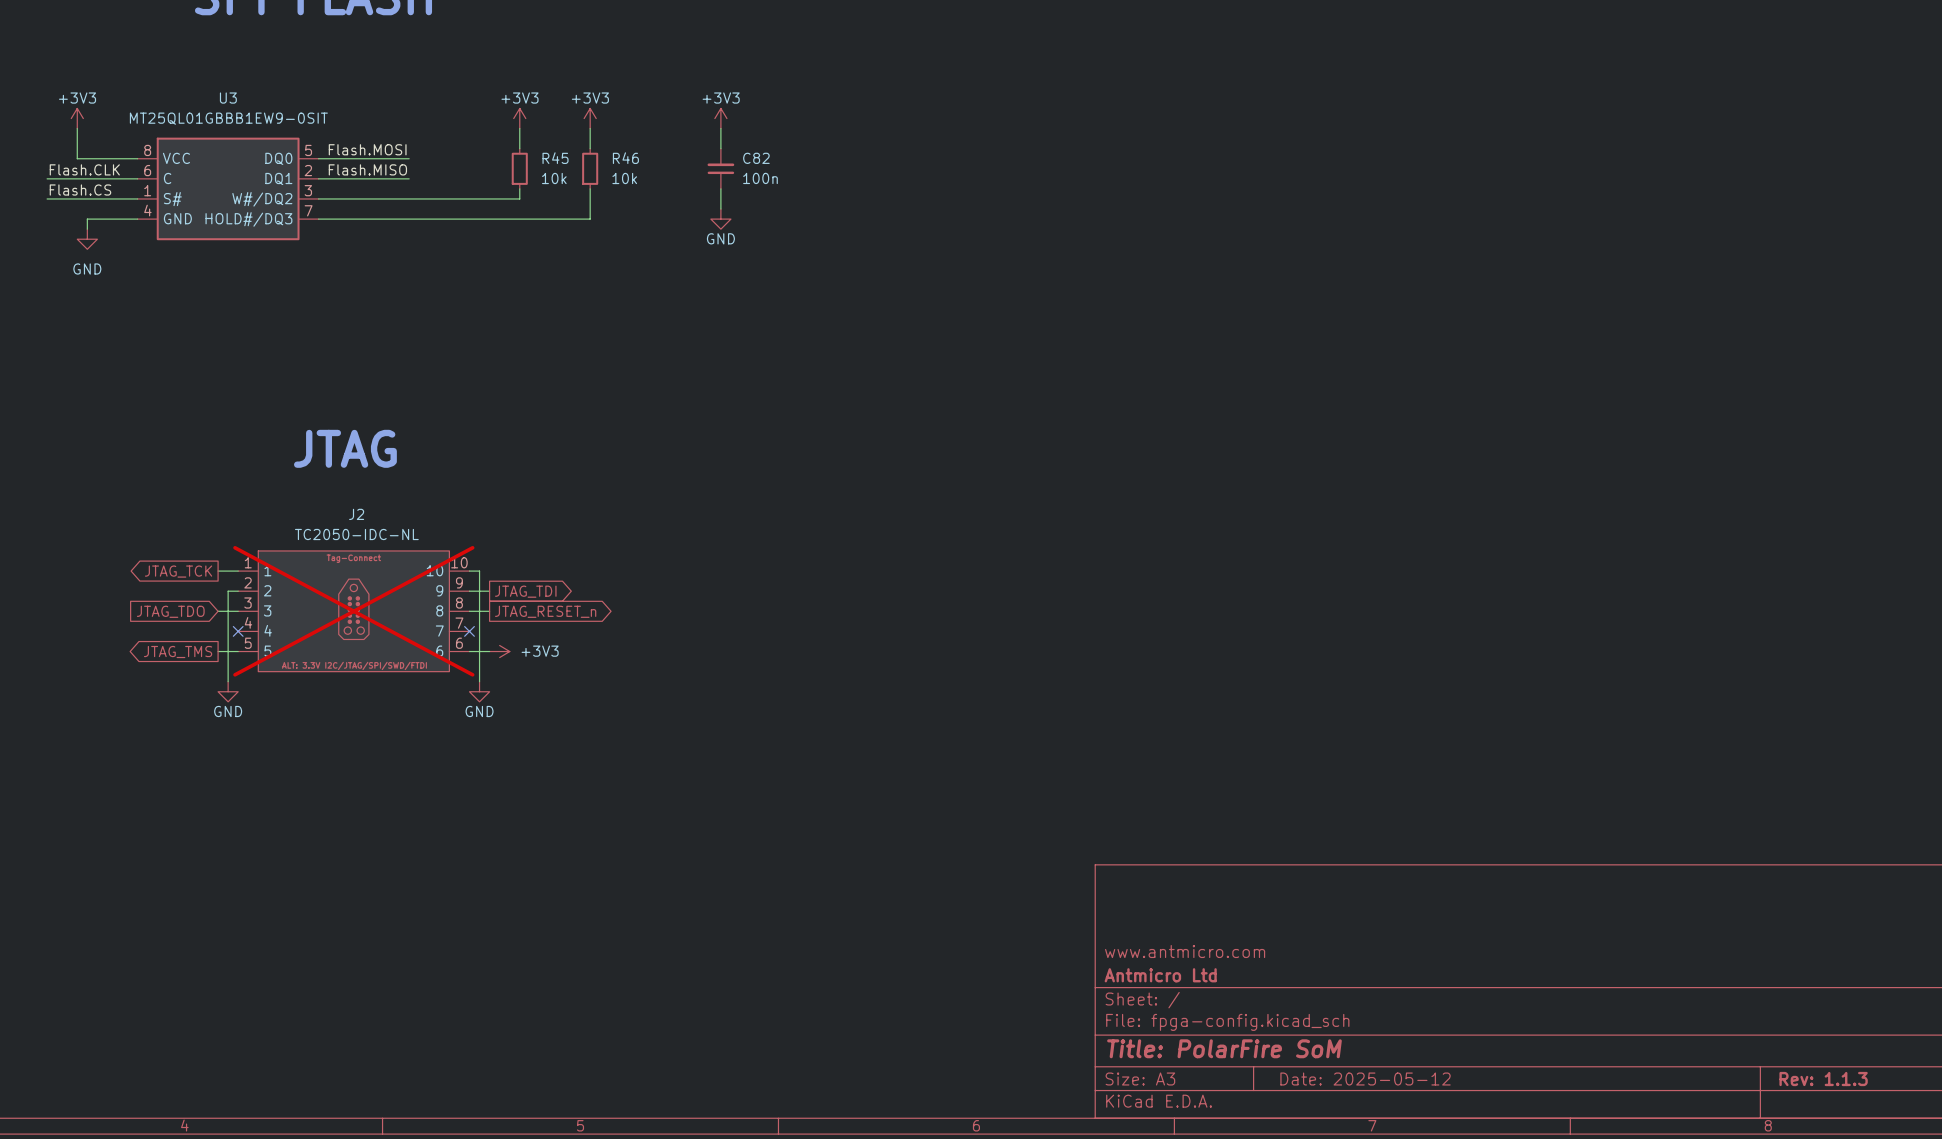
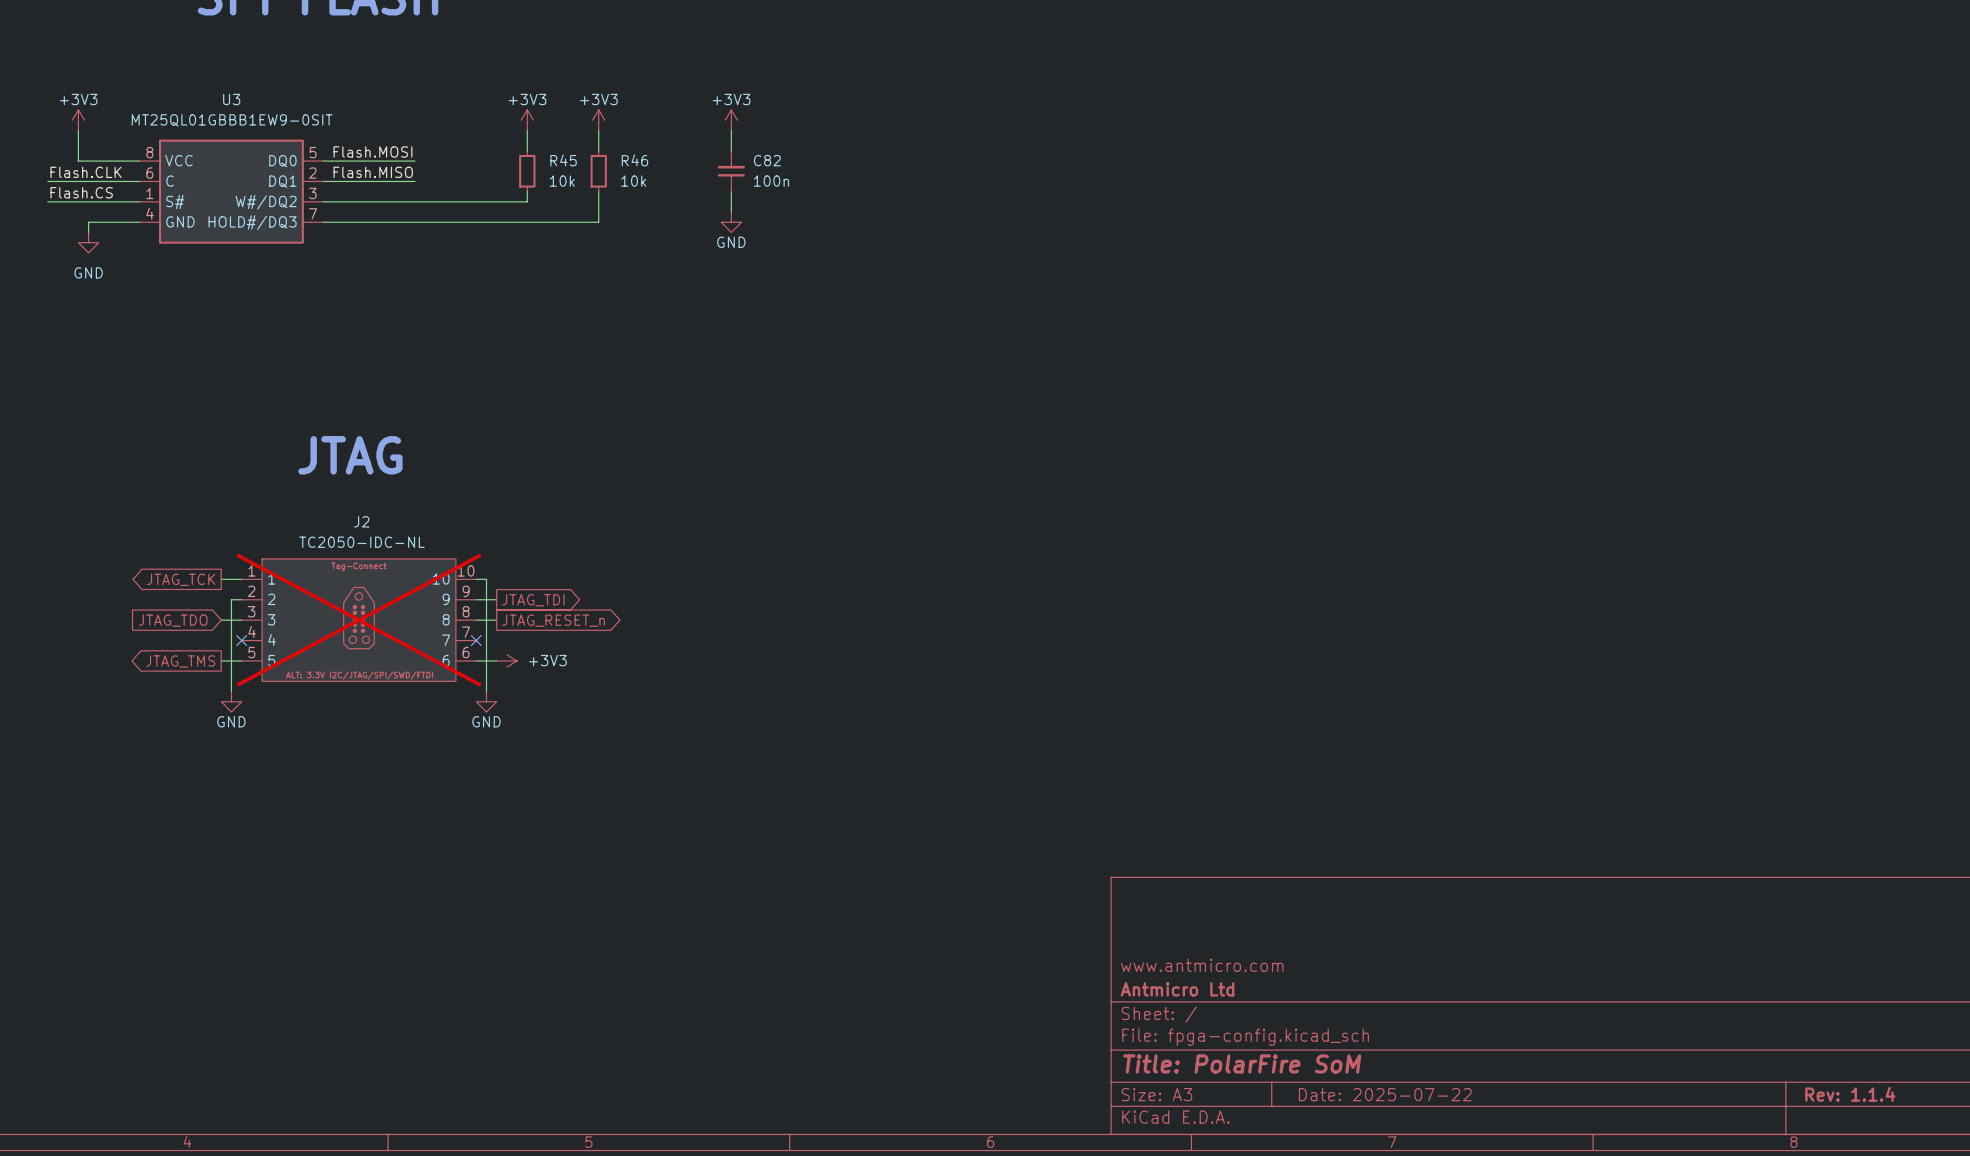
title block: Date: 2025-05-12 (1365, 1079) -> Date: 2025-07-22 (1385, 1094)
title block: Rev: 1.1.3 (1823, 1079) -> Rev: 1.1.4 (1850, 1094)

